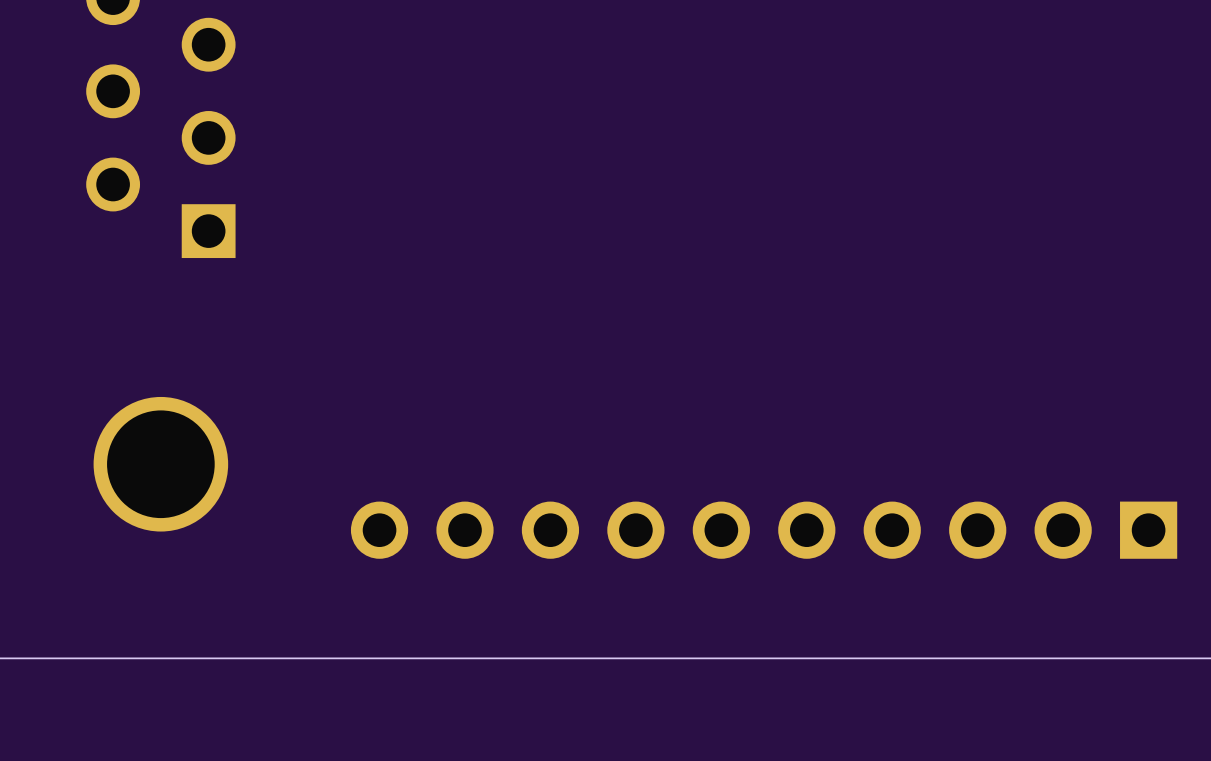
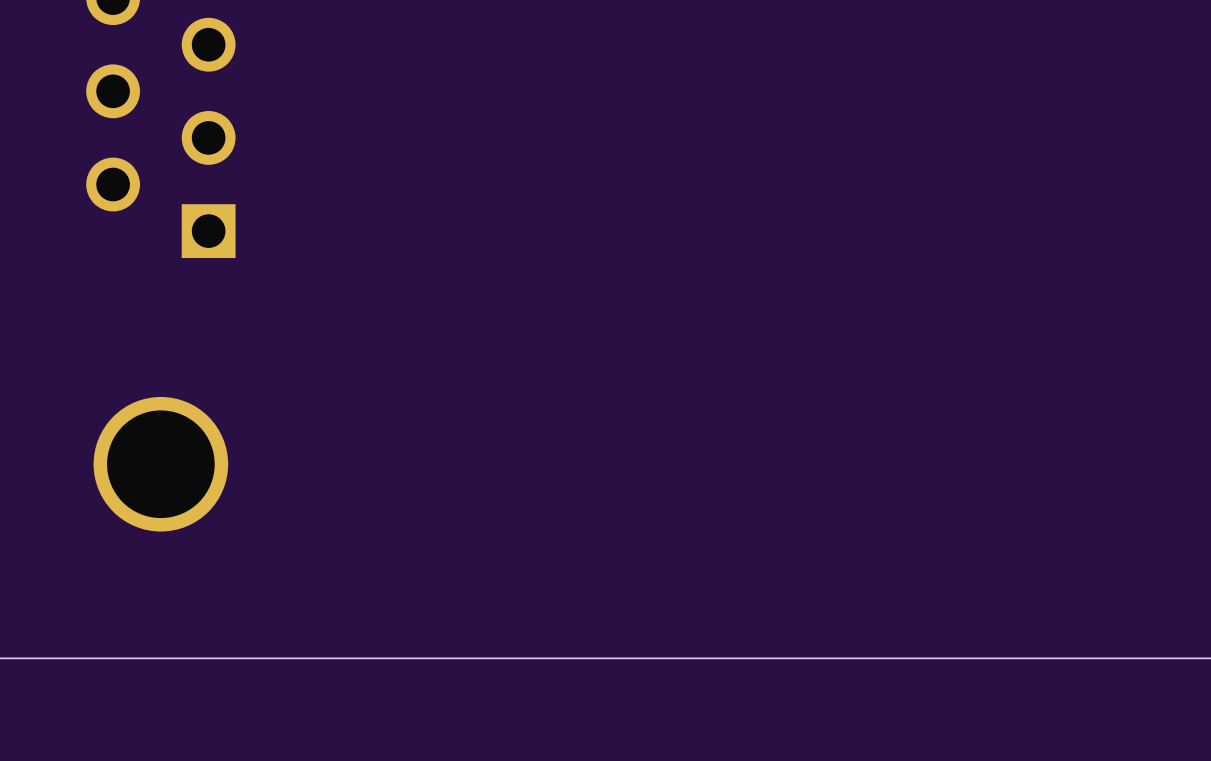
part: (764, 530) -> none

